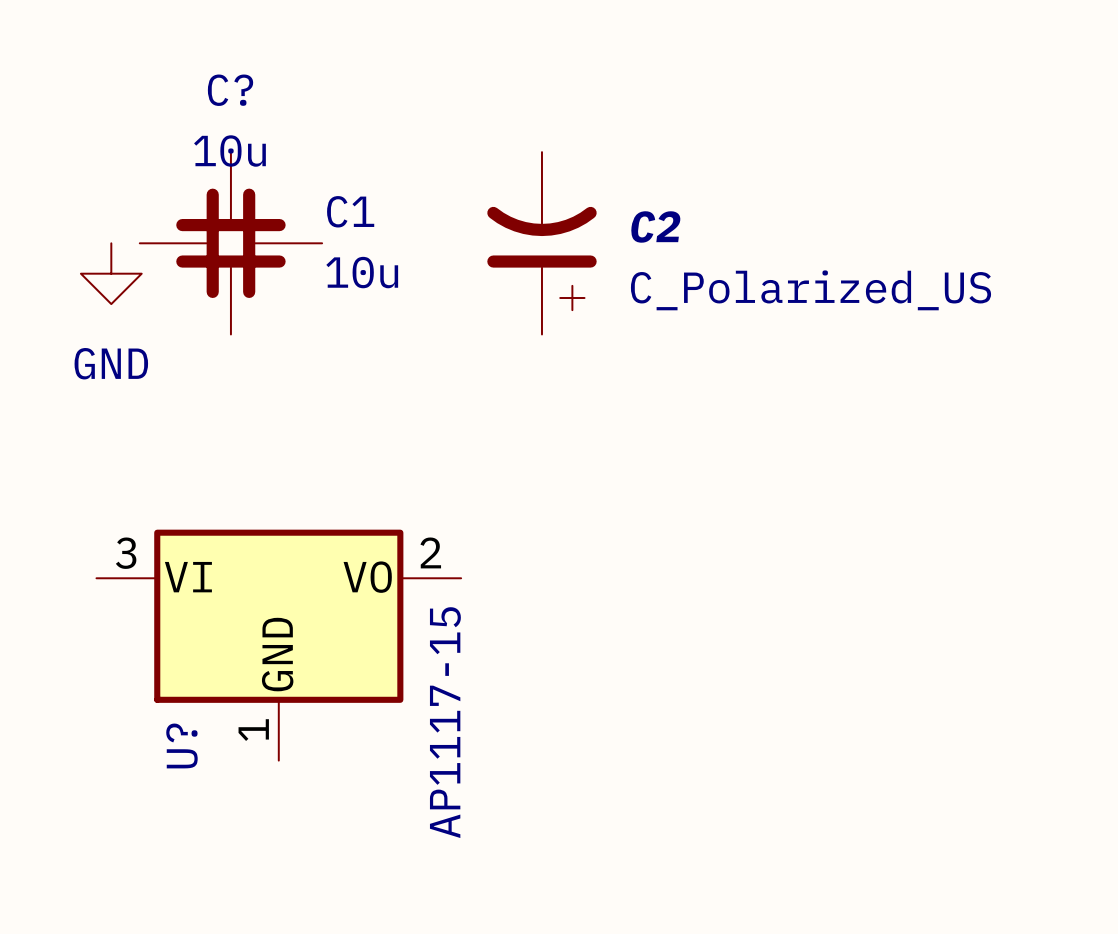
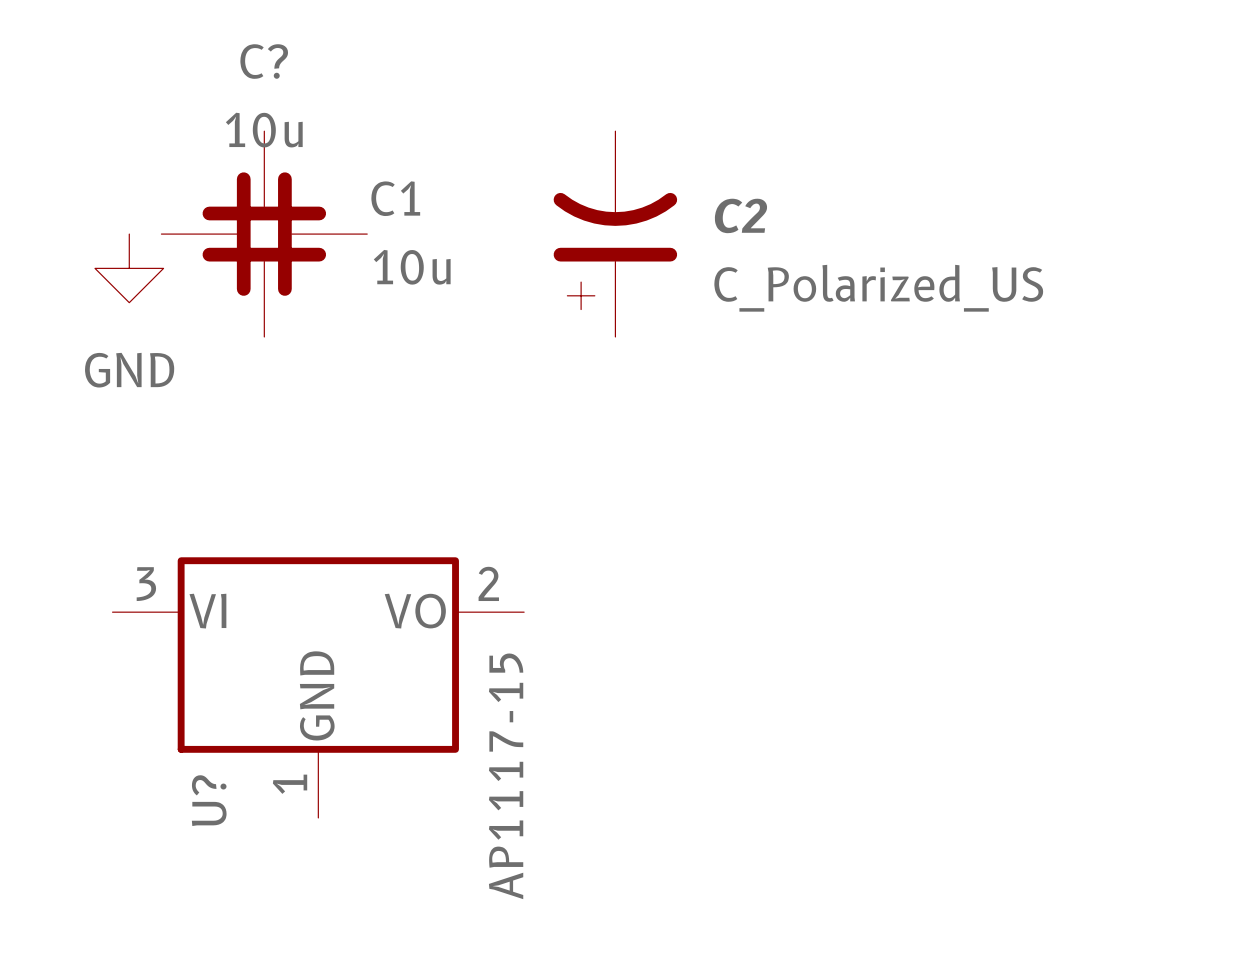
C2 flip: as is (541, 258) -> left-right (615, 251)

